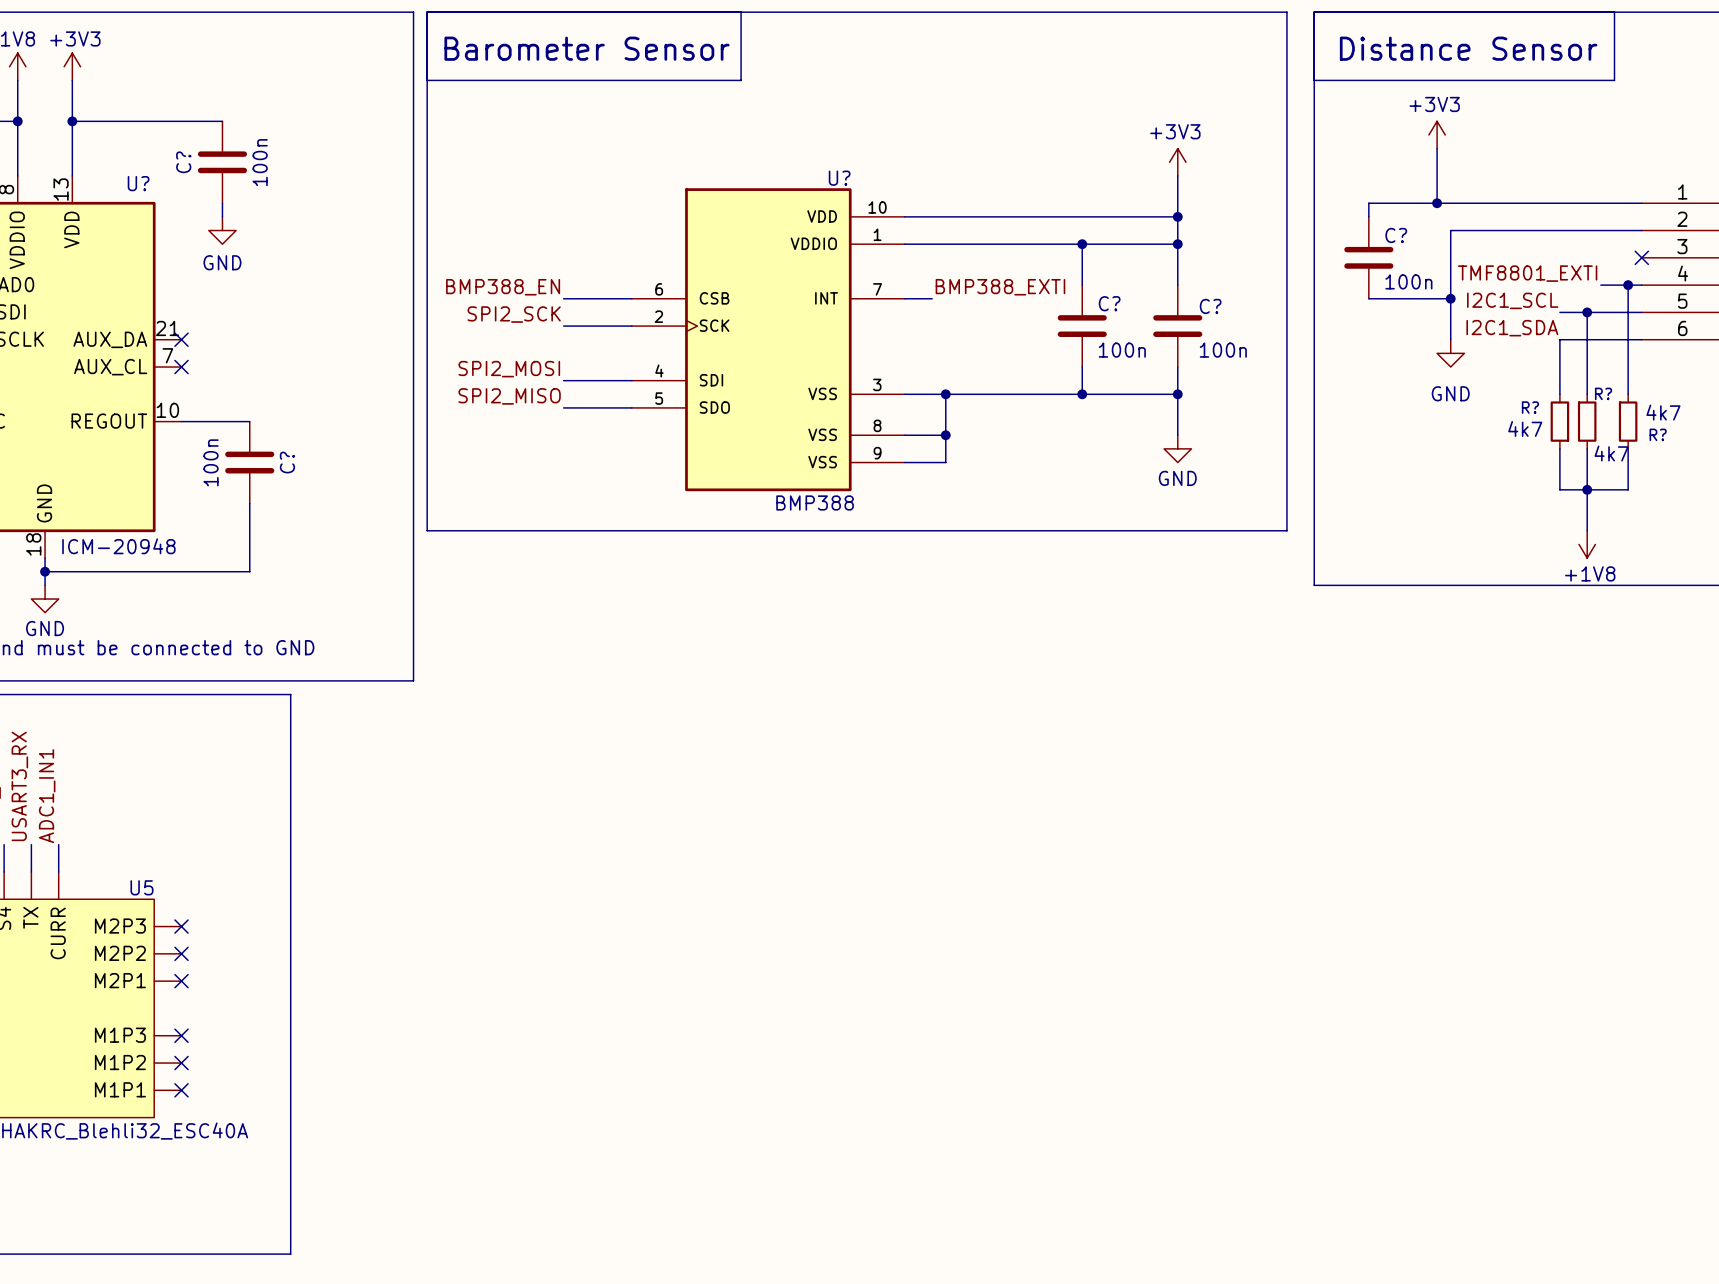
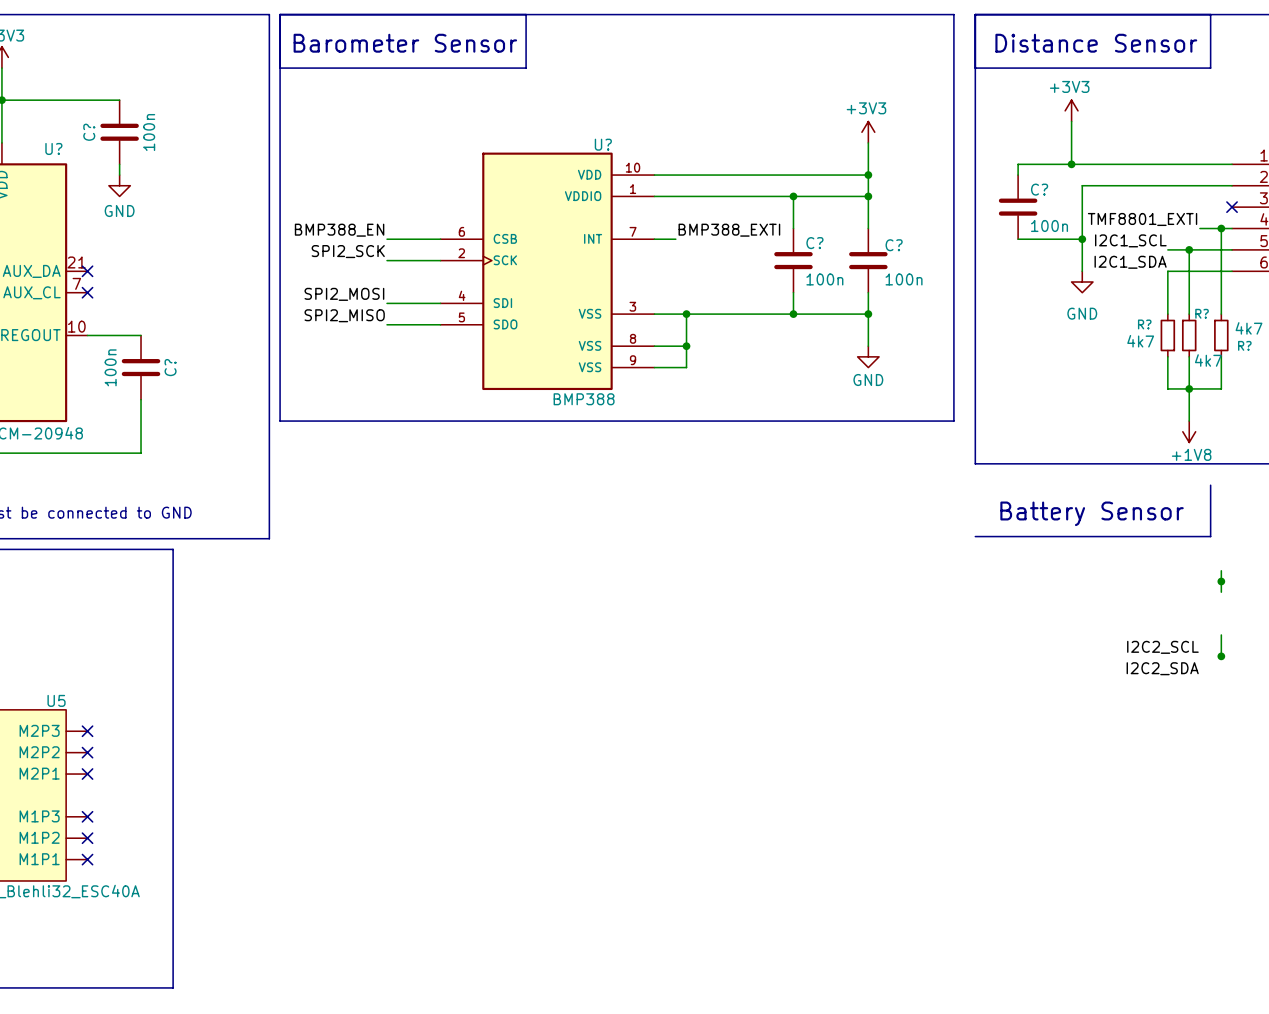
line: none -> (1210, 485) (1210, 536) (975, 536)
text: none -> Battery Sensor (1092, 513)
wire: none -> (1221, 570) (1221, 592)
junction: none -> (1221, 581)
wire: none -> (1221, 634) (1221, 656)
label: none -> I2C2_SCL (1162, 647)
junction: none -> (1221, 656)
label: none -> I2C2_SDA (1162, 668)

